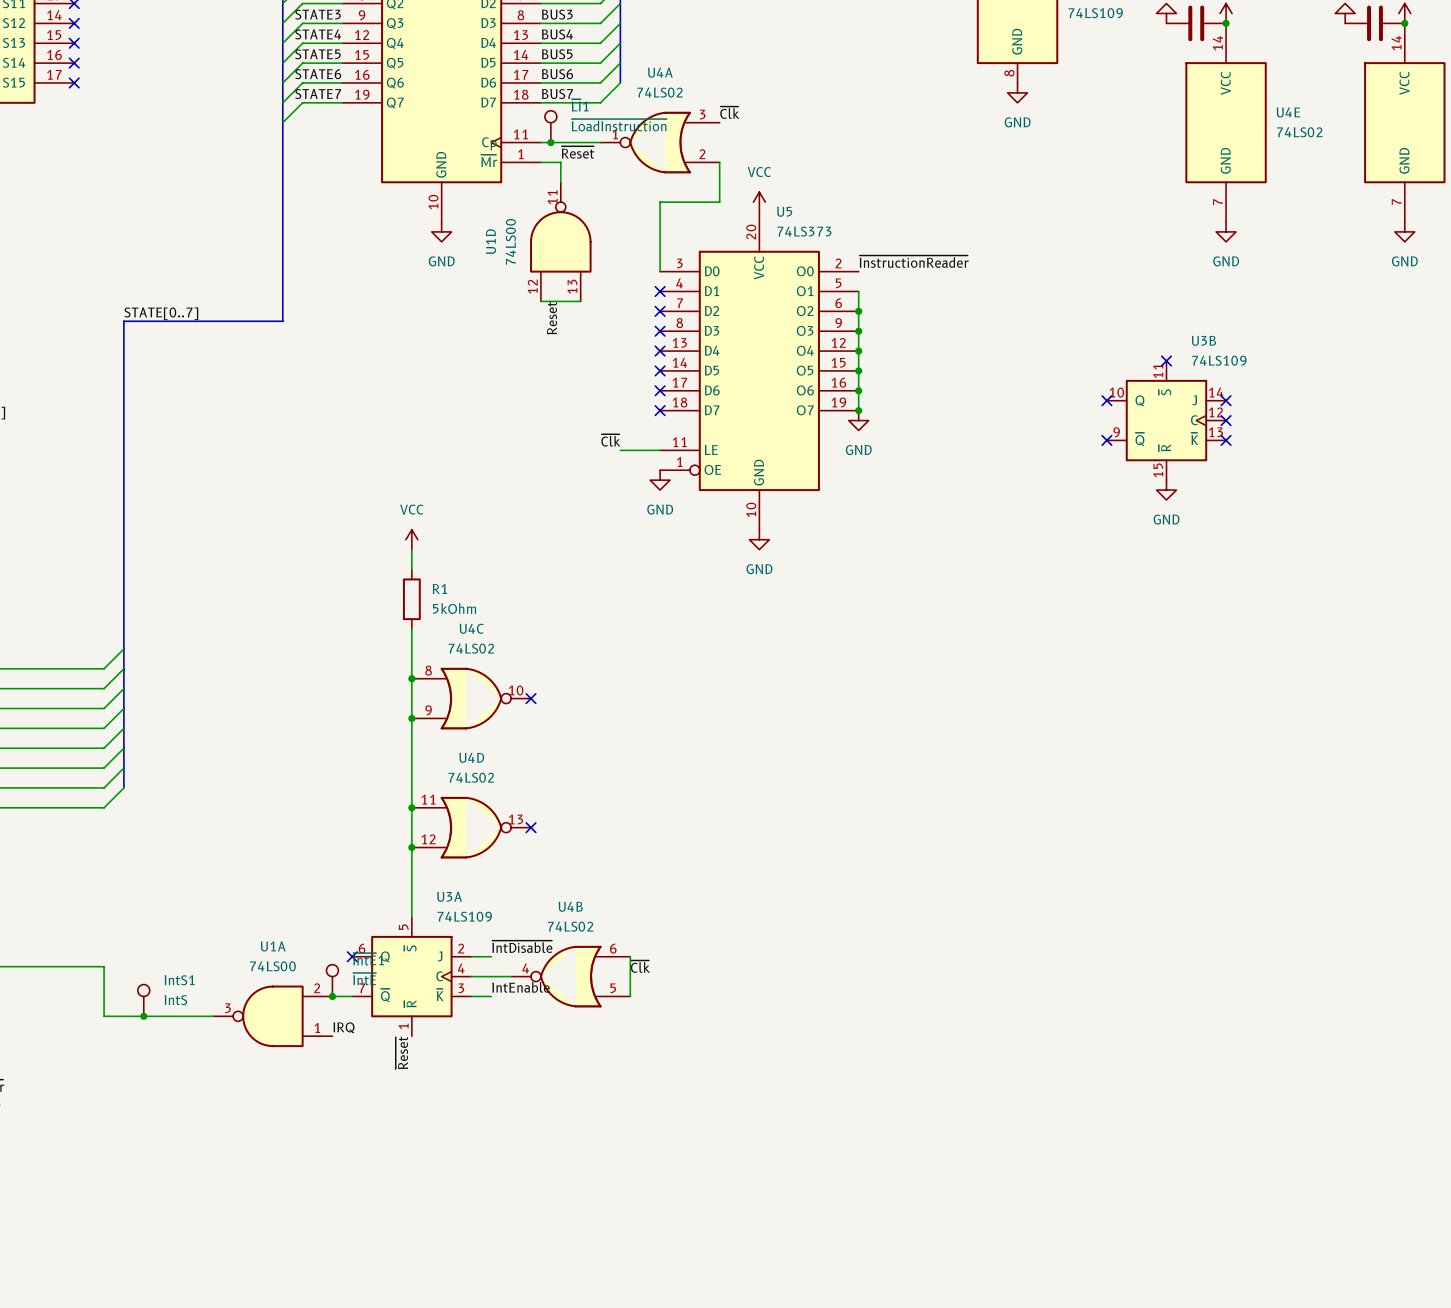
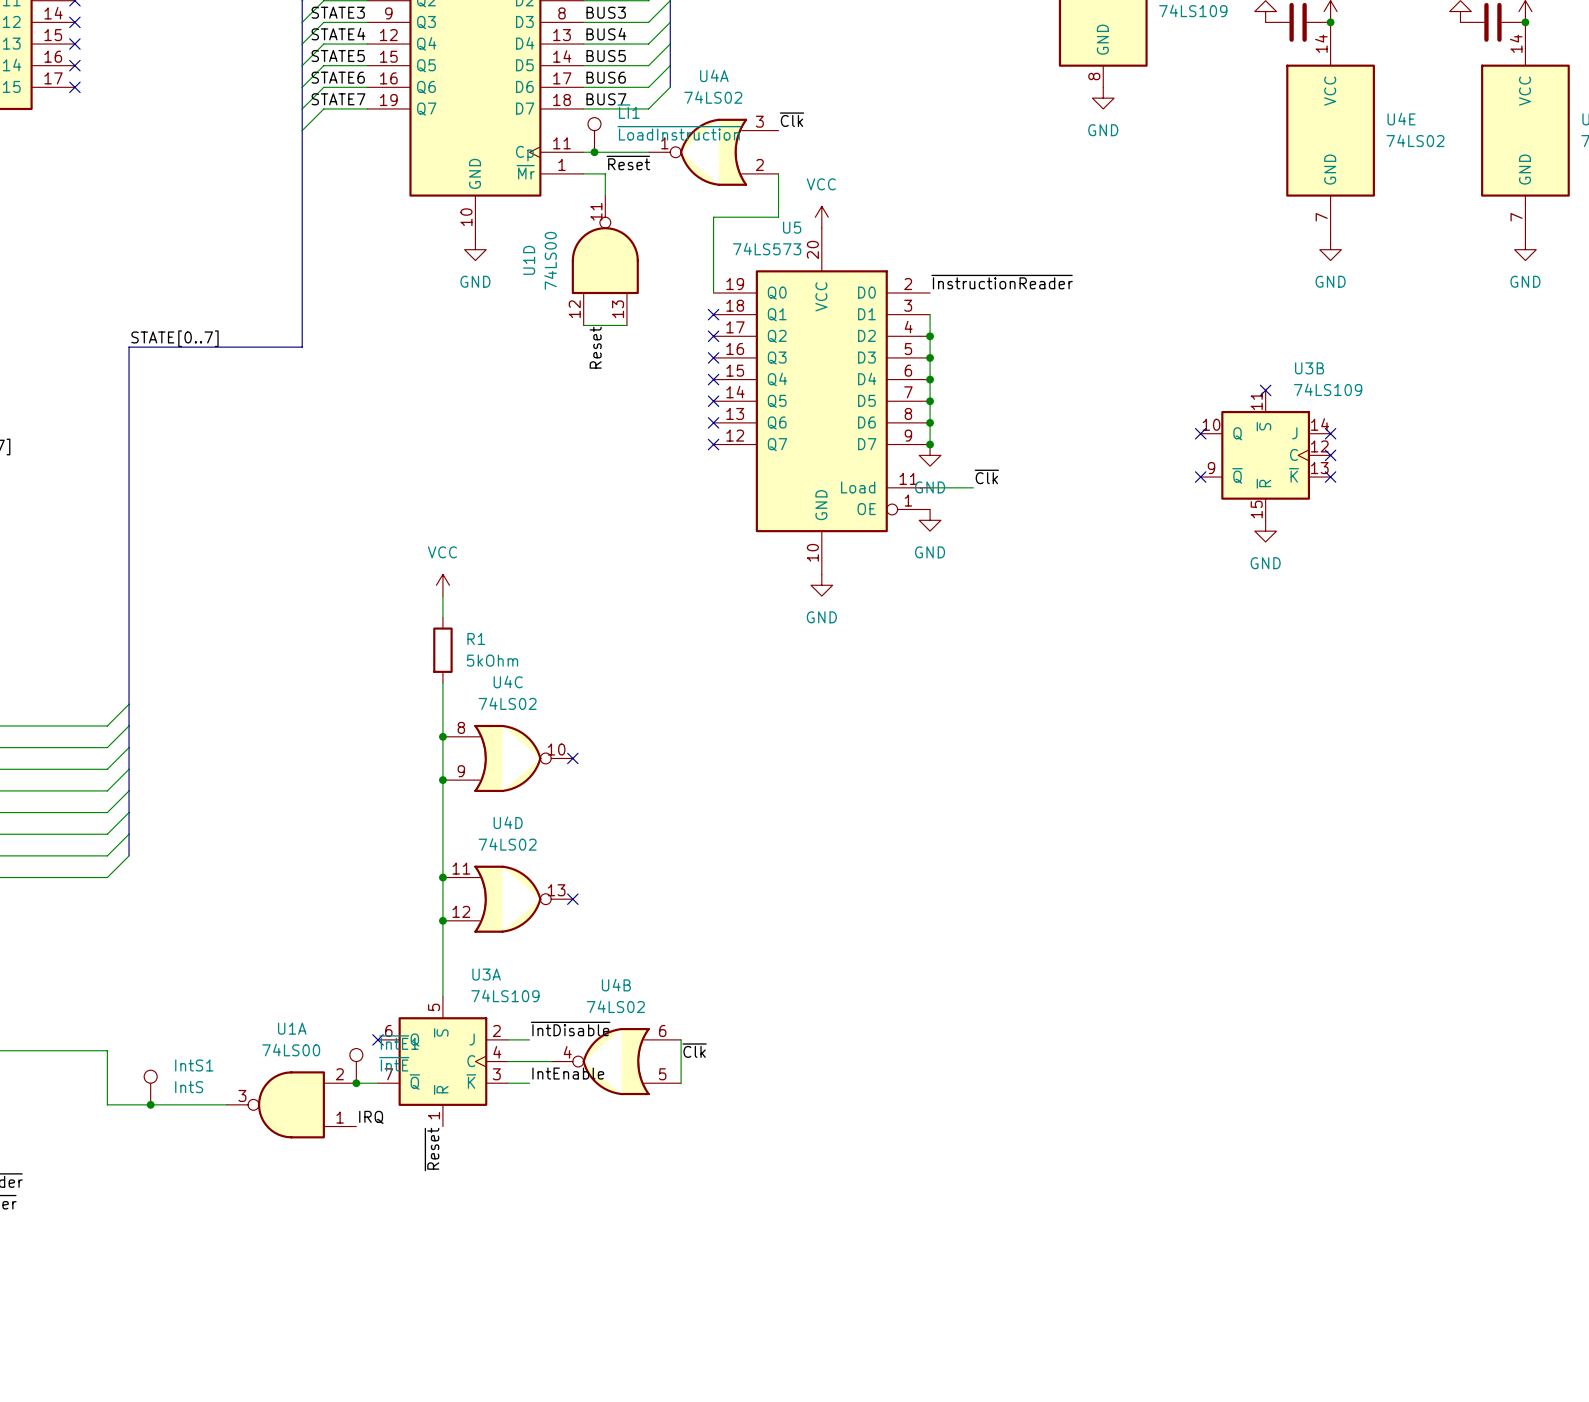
U5 name position: U5 (784, 211) -> U5 (792, 227)
U5 symbol: [660, 212, 859, 530] -> [713, 228, 931, 575]
U5 value: 74LS373 (804, 231) -> 74LS573 (767, 249)
label: ~{Clk} (610, 440) -> none
label: none -> ~{Clk} (986, 476)
wire: (620, 450) (660, 450) -> none
wire: none -> (930, 487) (973, 487)
power symbol: GND (660, 480) -> none
power symbol: none -> GND (930, 520)

